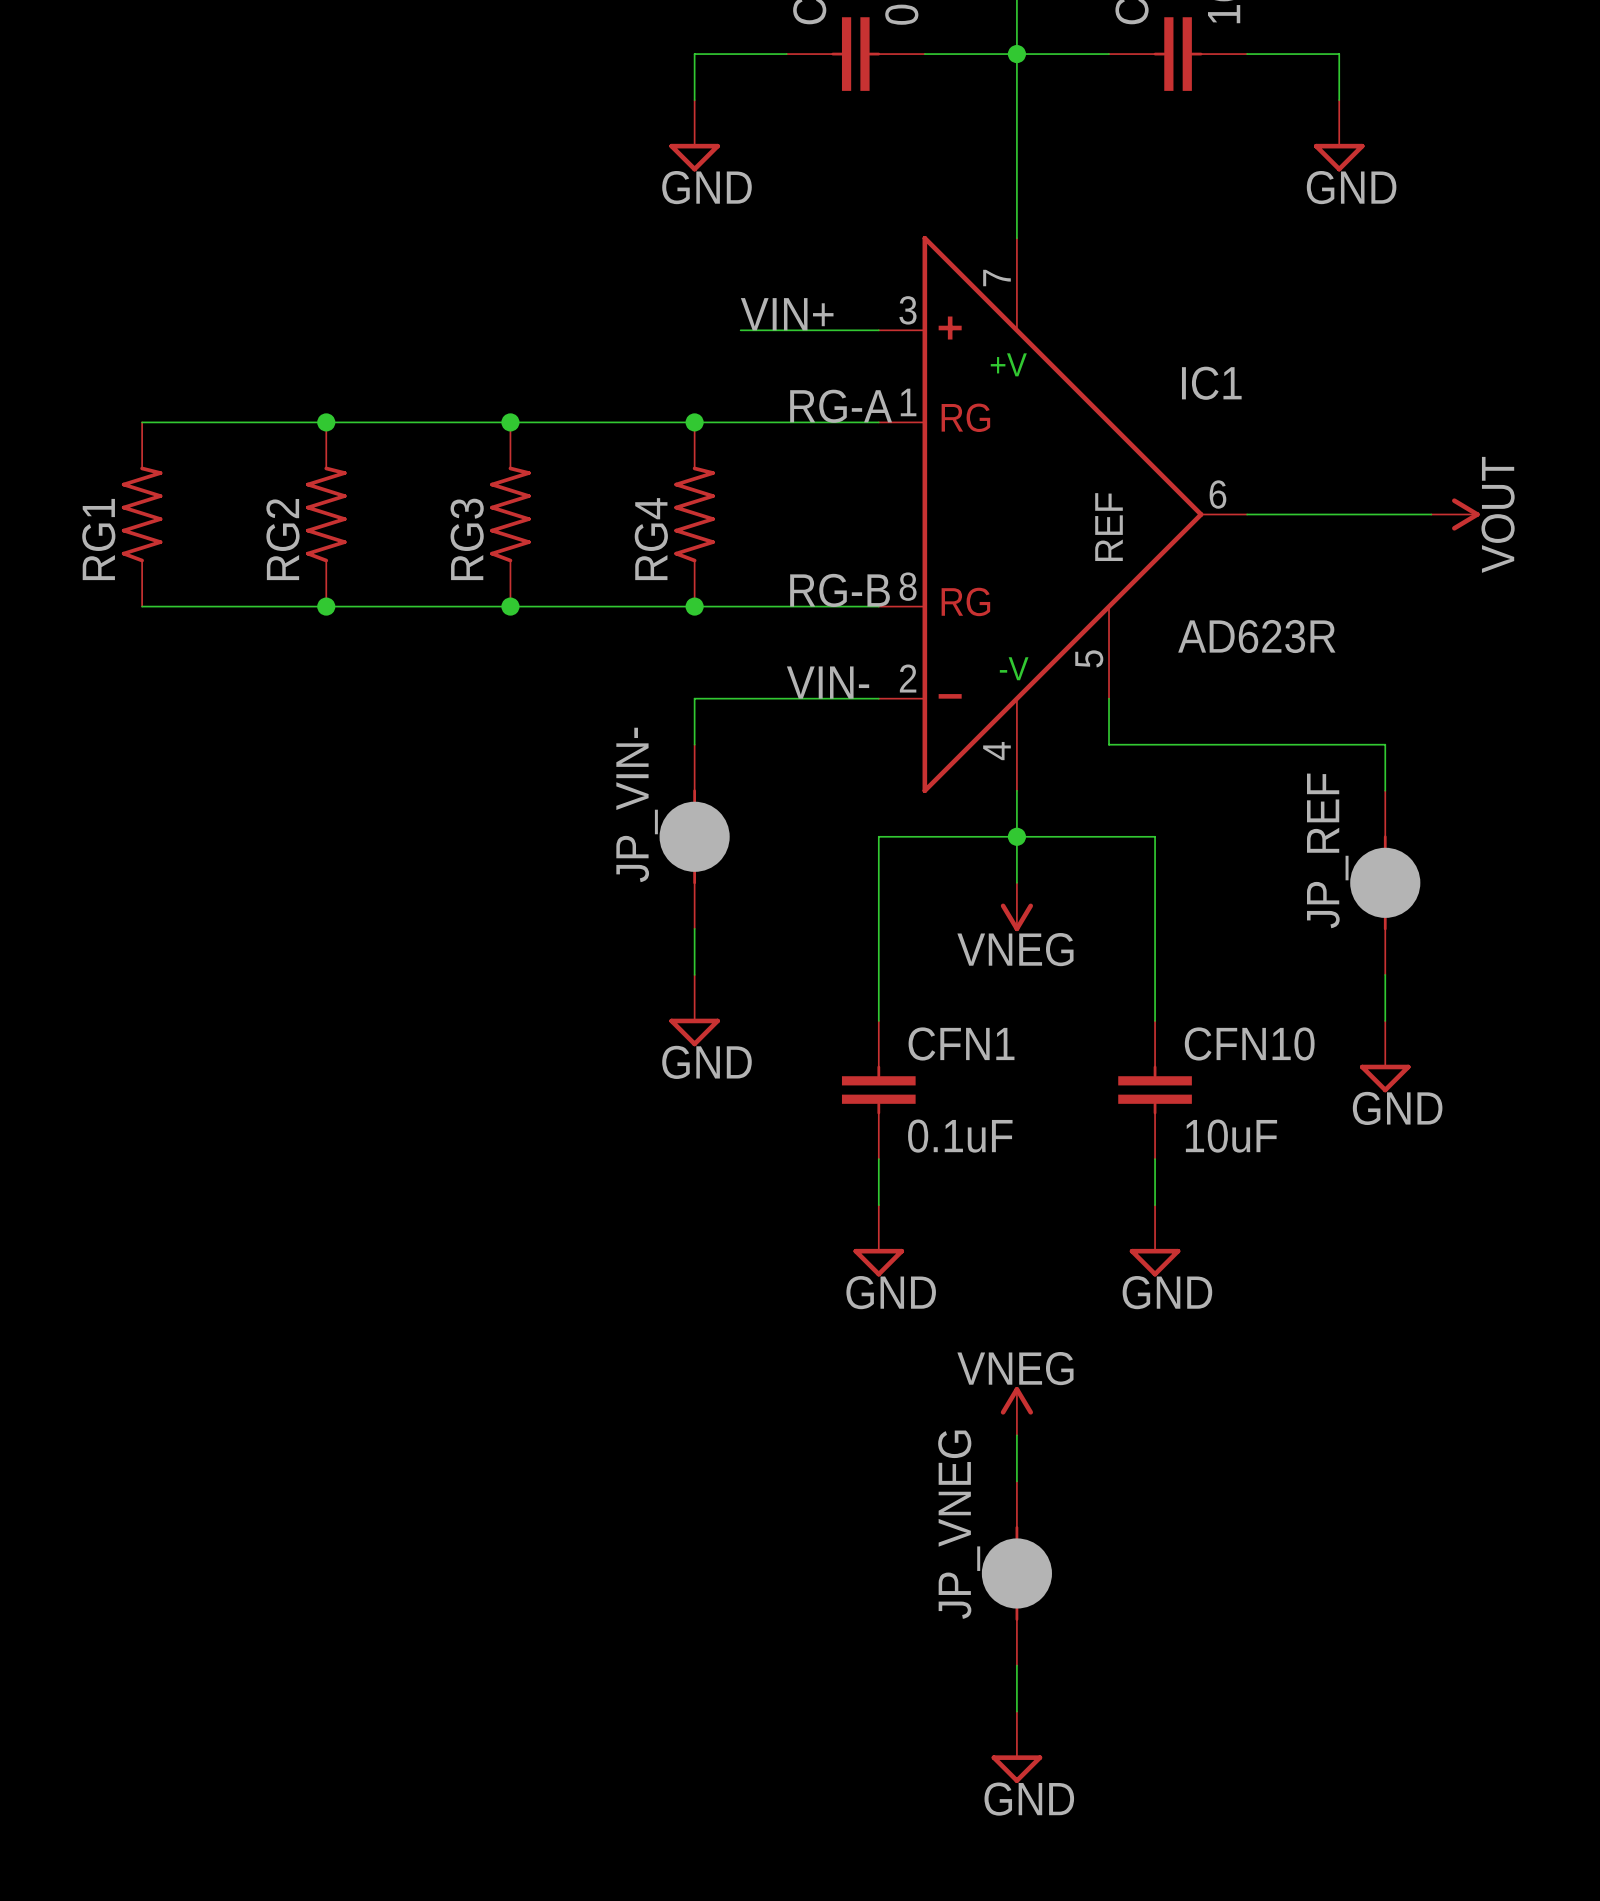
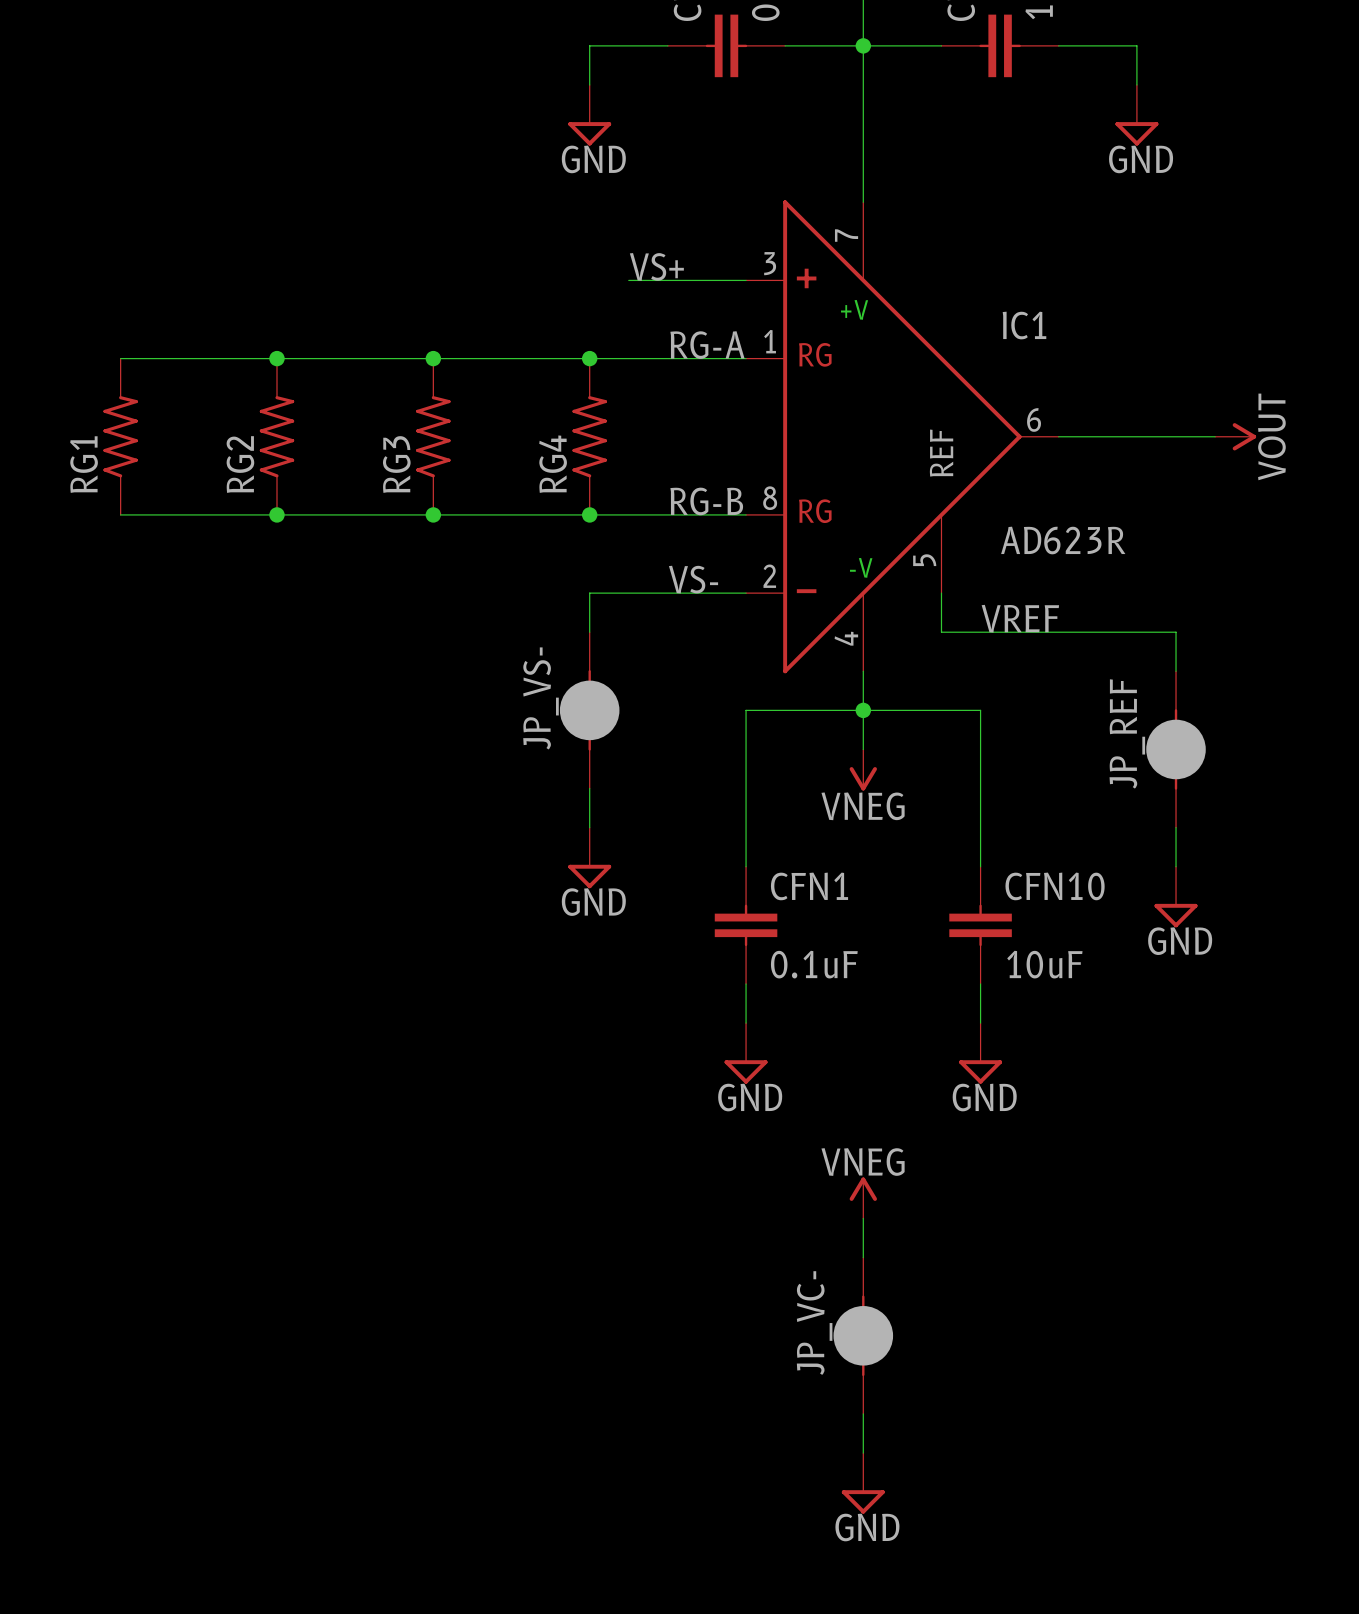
label: VIN+ (787, 314) -> VS+ (656, 266)
label: VIN- (828, 682) -> VS- (693, 579)
label: none -> VREF (1020, 618)
JP_VIN- name: JP_VIN- (637, 804) -> JP_VS- (541, 698)
JP_VNEG name: JP_VNEG (959, 1524) -> JP_VC- (814, 1323)

